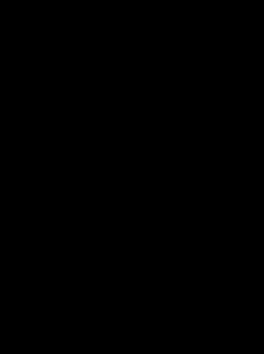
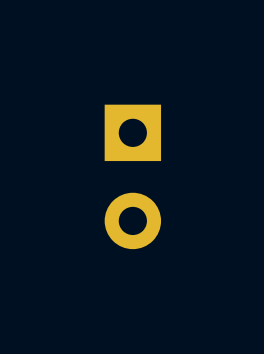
part: none -> (132, 176)

